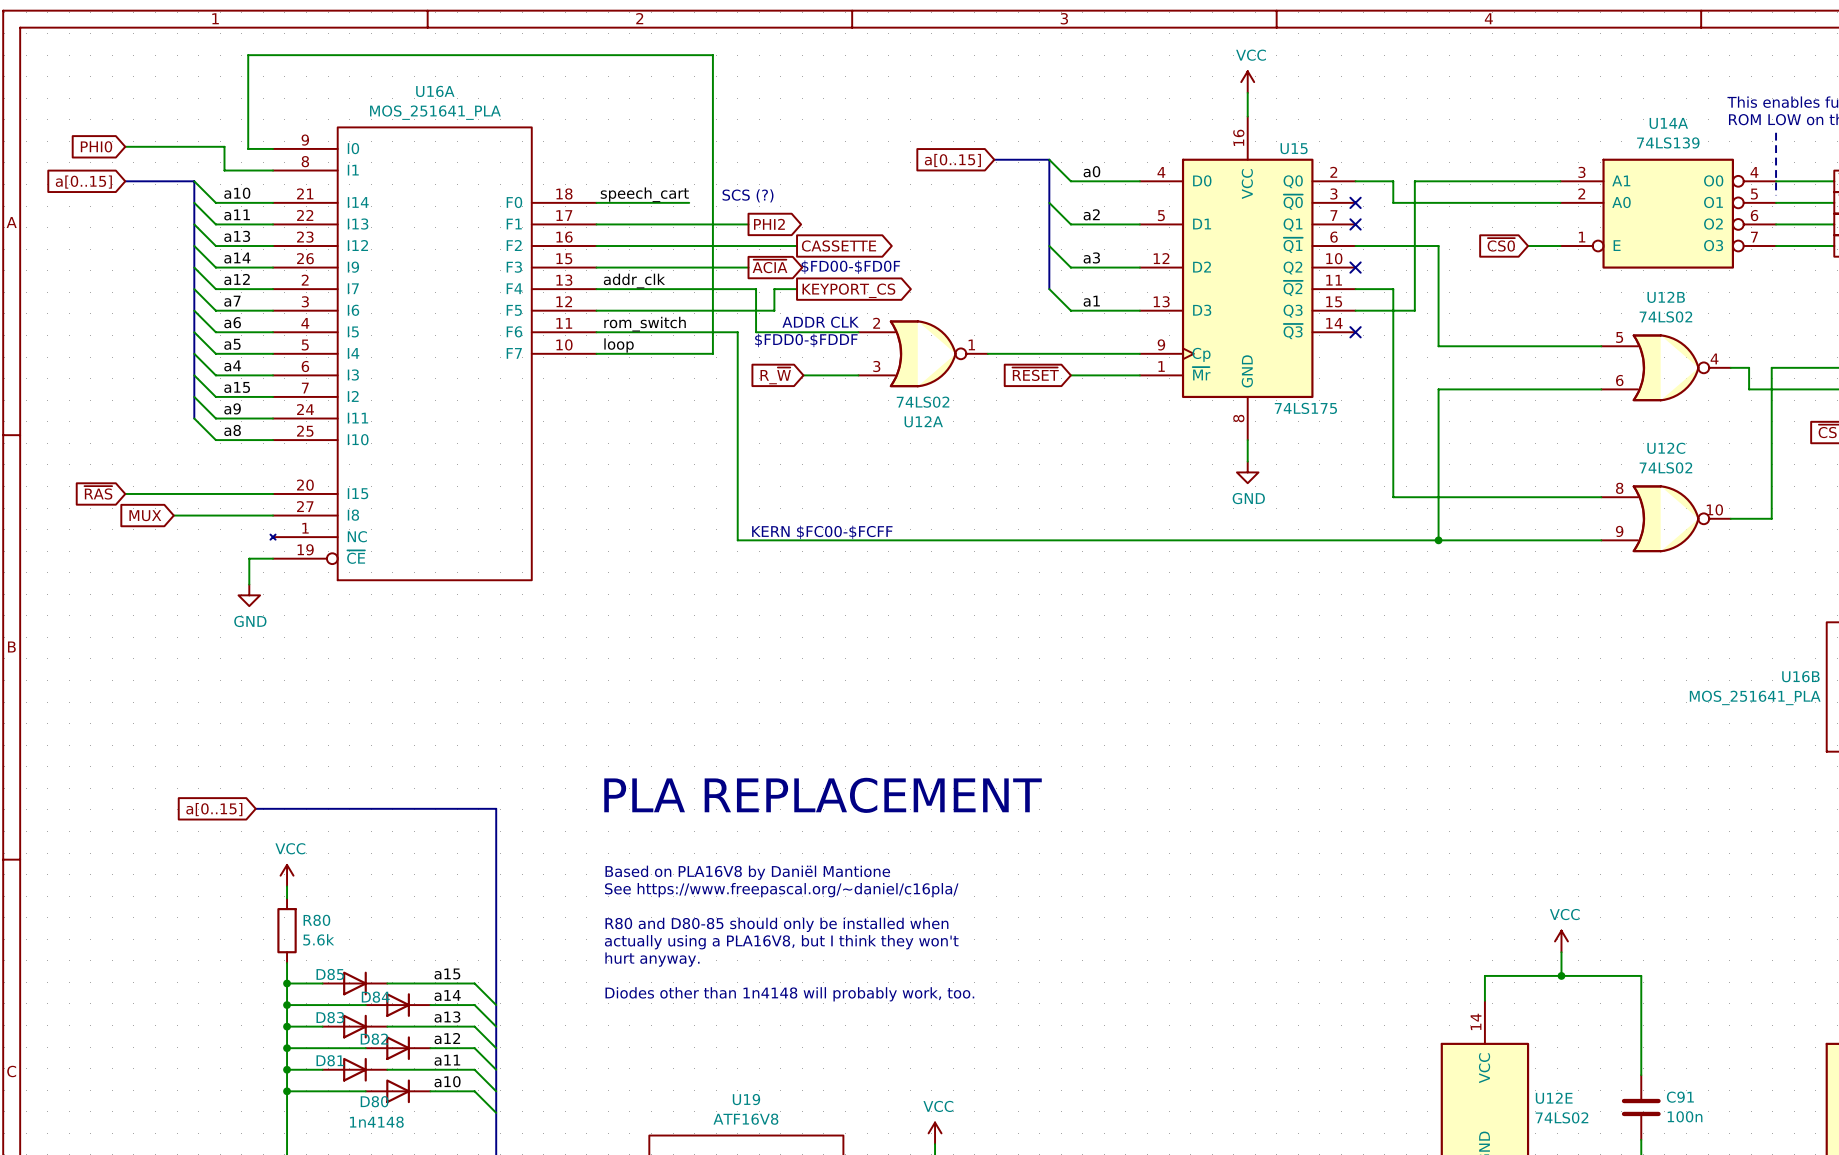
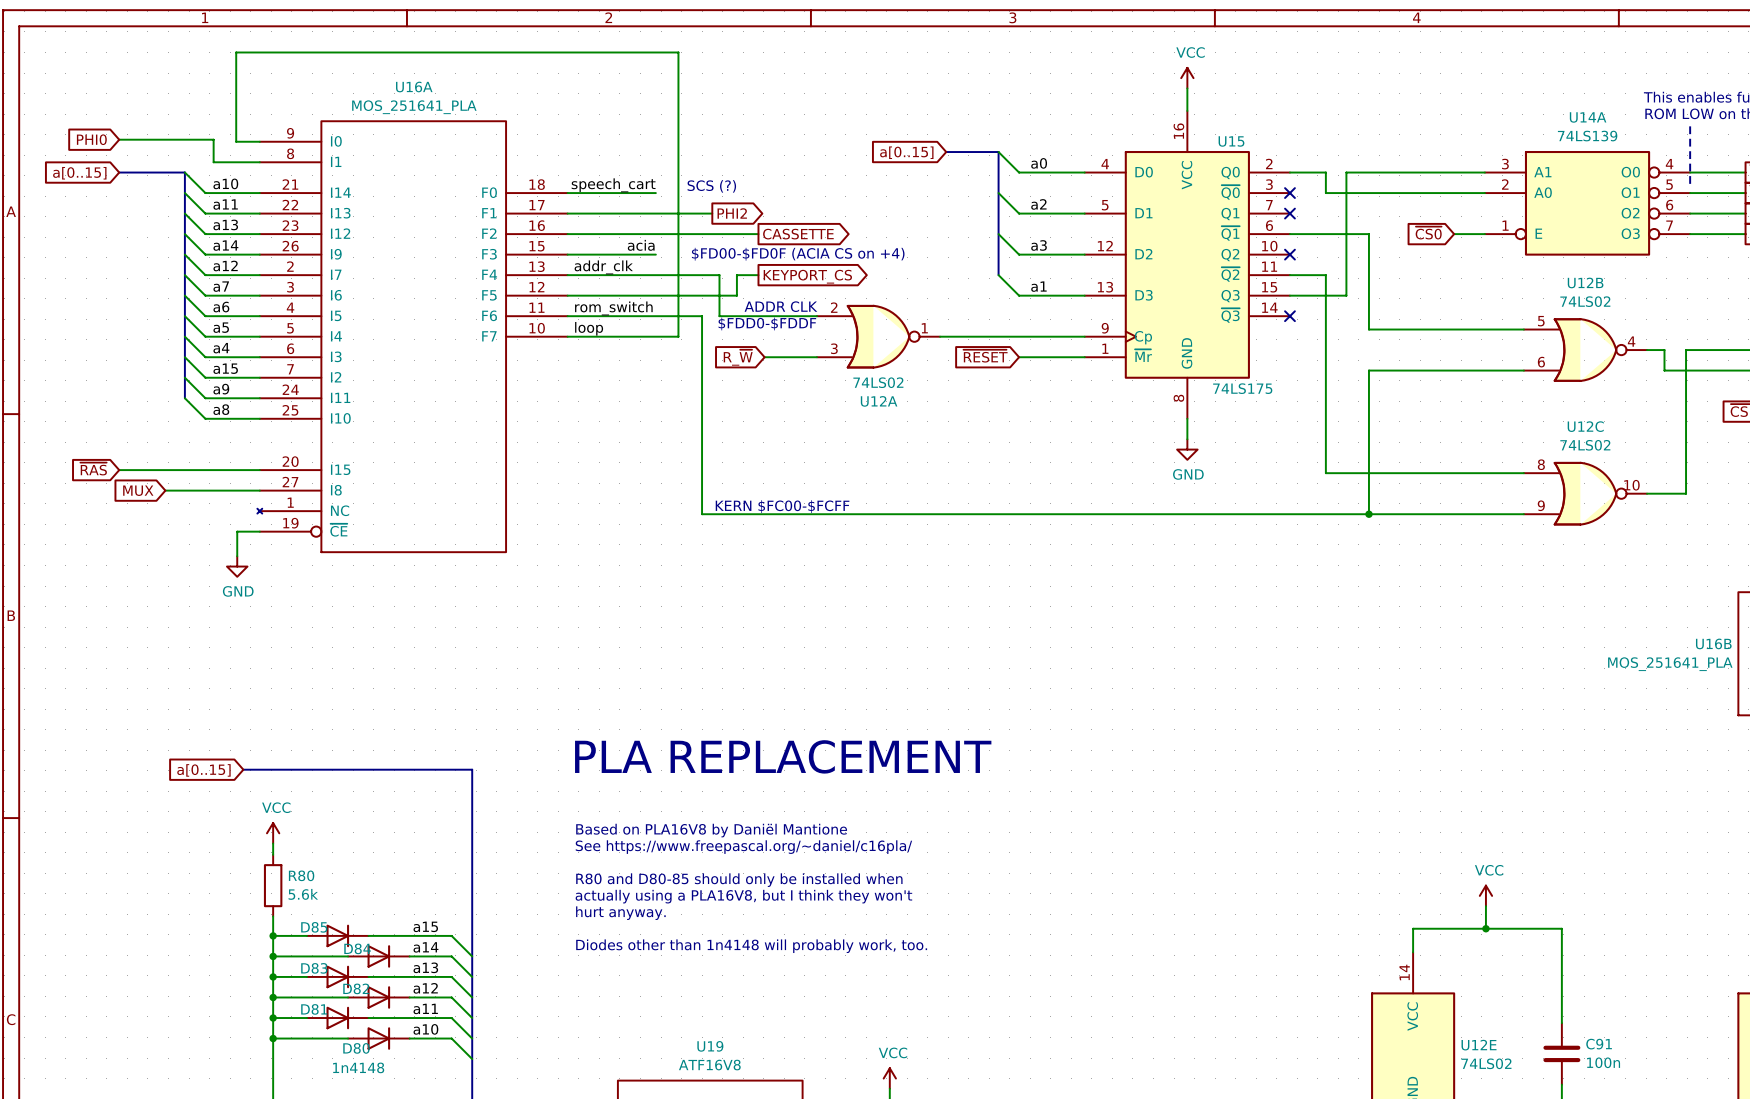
label: none -> acia (641, 245)
global label: ~{ACIA} (770, 266) -> none
wire: (689, 267) (748, 267) -> none
text: none -> $FD00-$FD0F (ACIA CS on +4) (798, 254)
text: $FD00-$FD0F (850, 267) -> none

